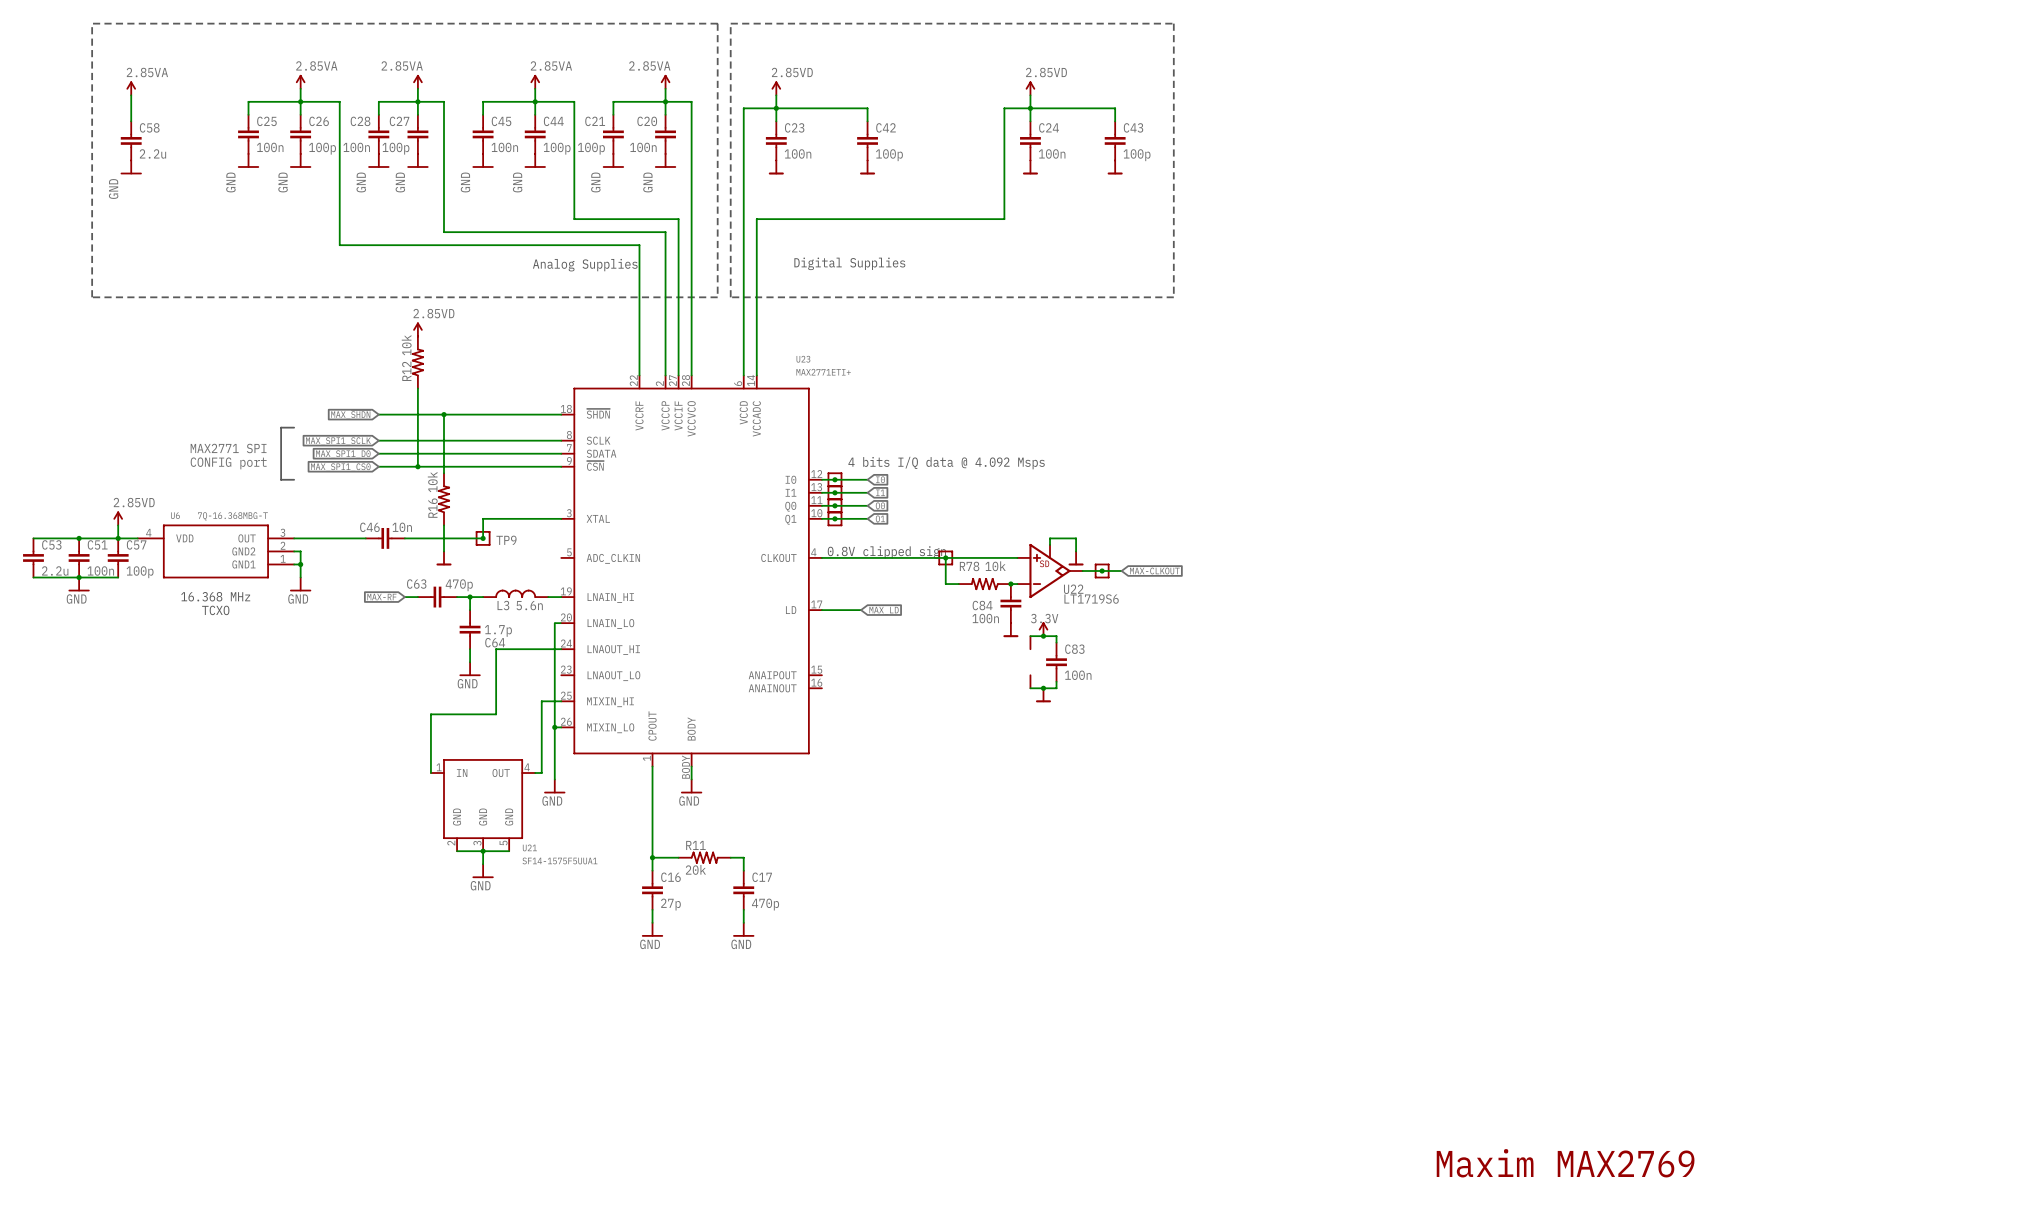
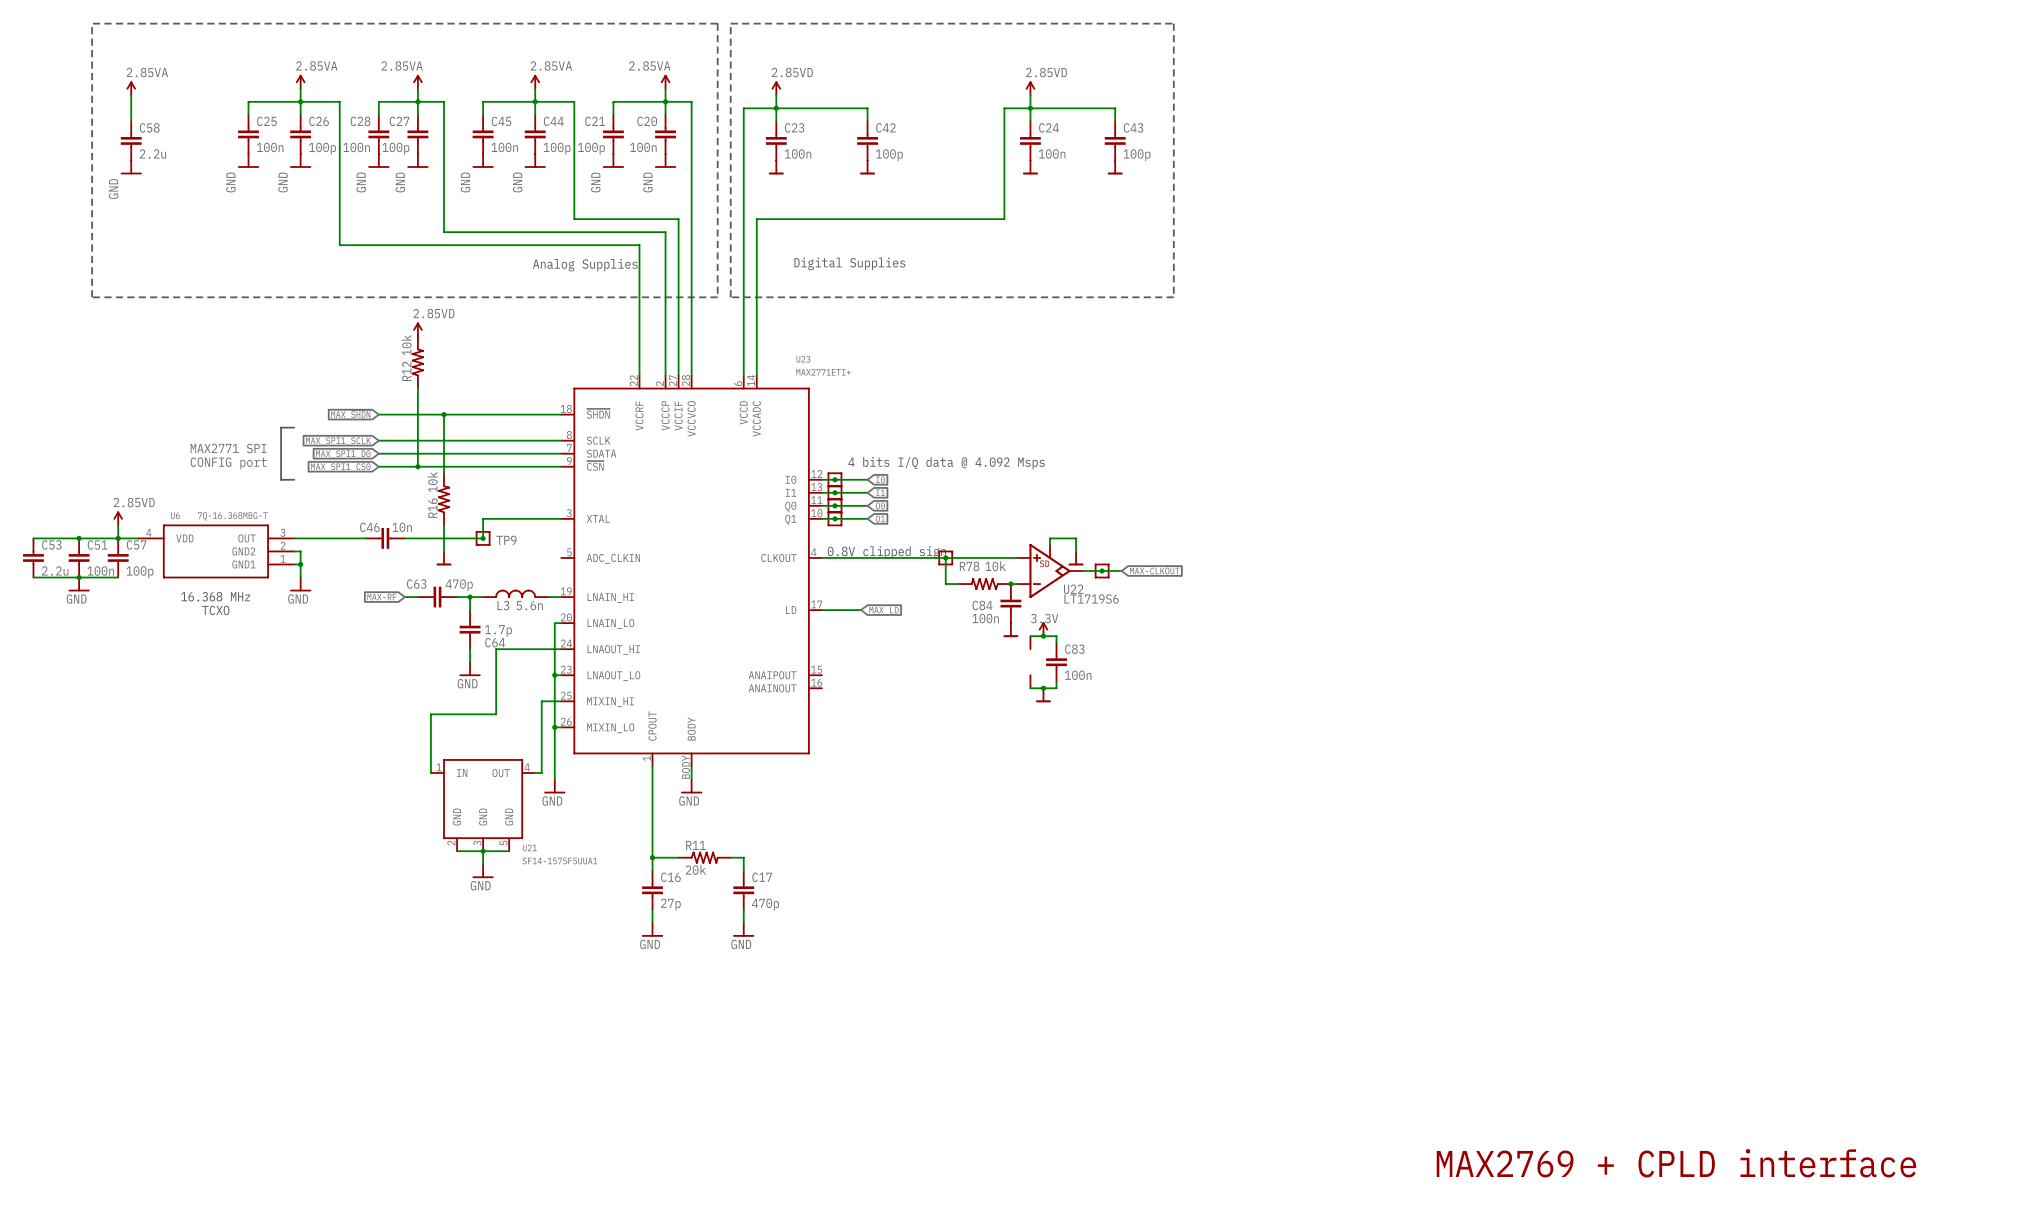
wire: none -> (554, 675) (561, 675)
junction: none -> (554, 675)
text: Maxim MAX2769 (1565, 1163) -> MAX2769 + CPLD interface (1676, 1163)

